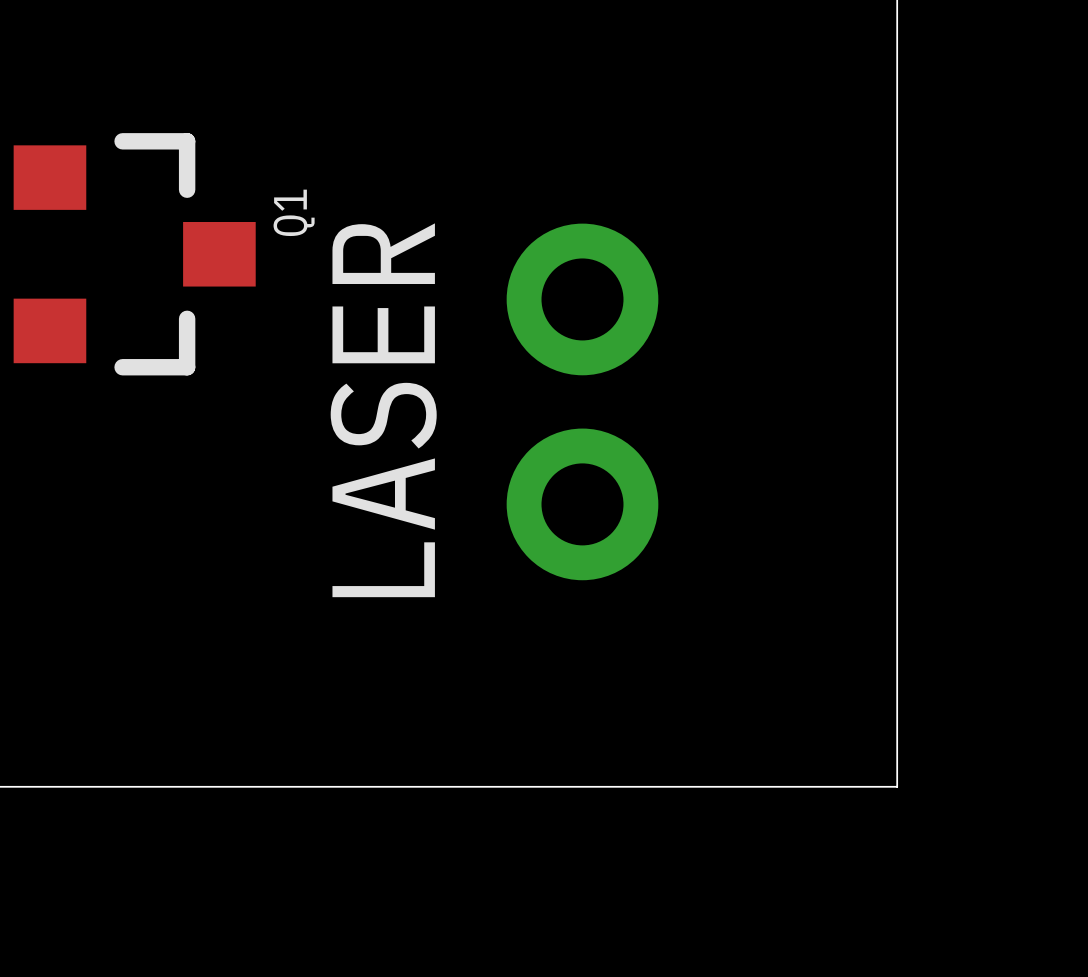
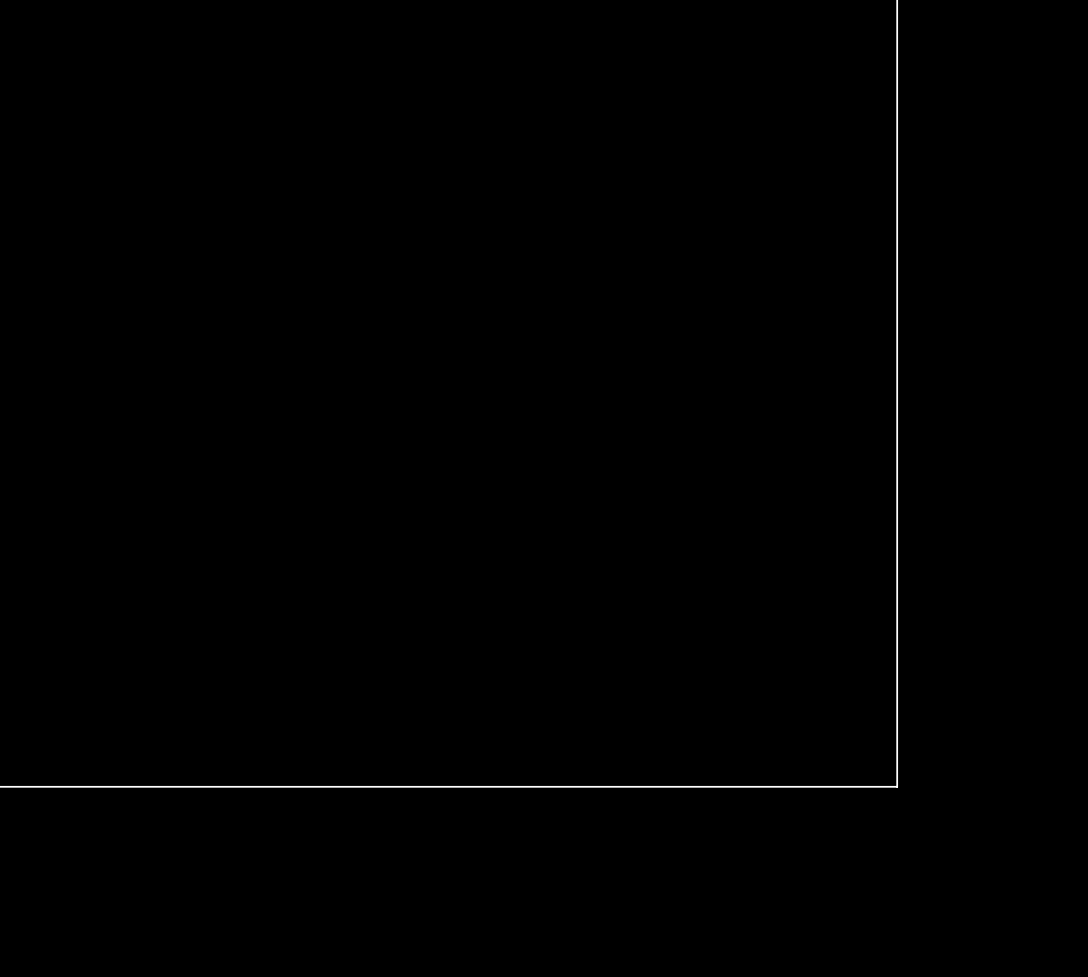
Q1: (134, 254) -> none
LASER: (582, 401) -> none

